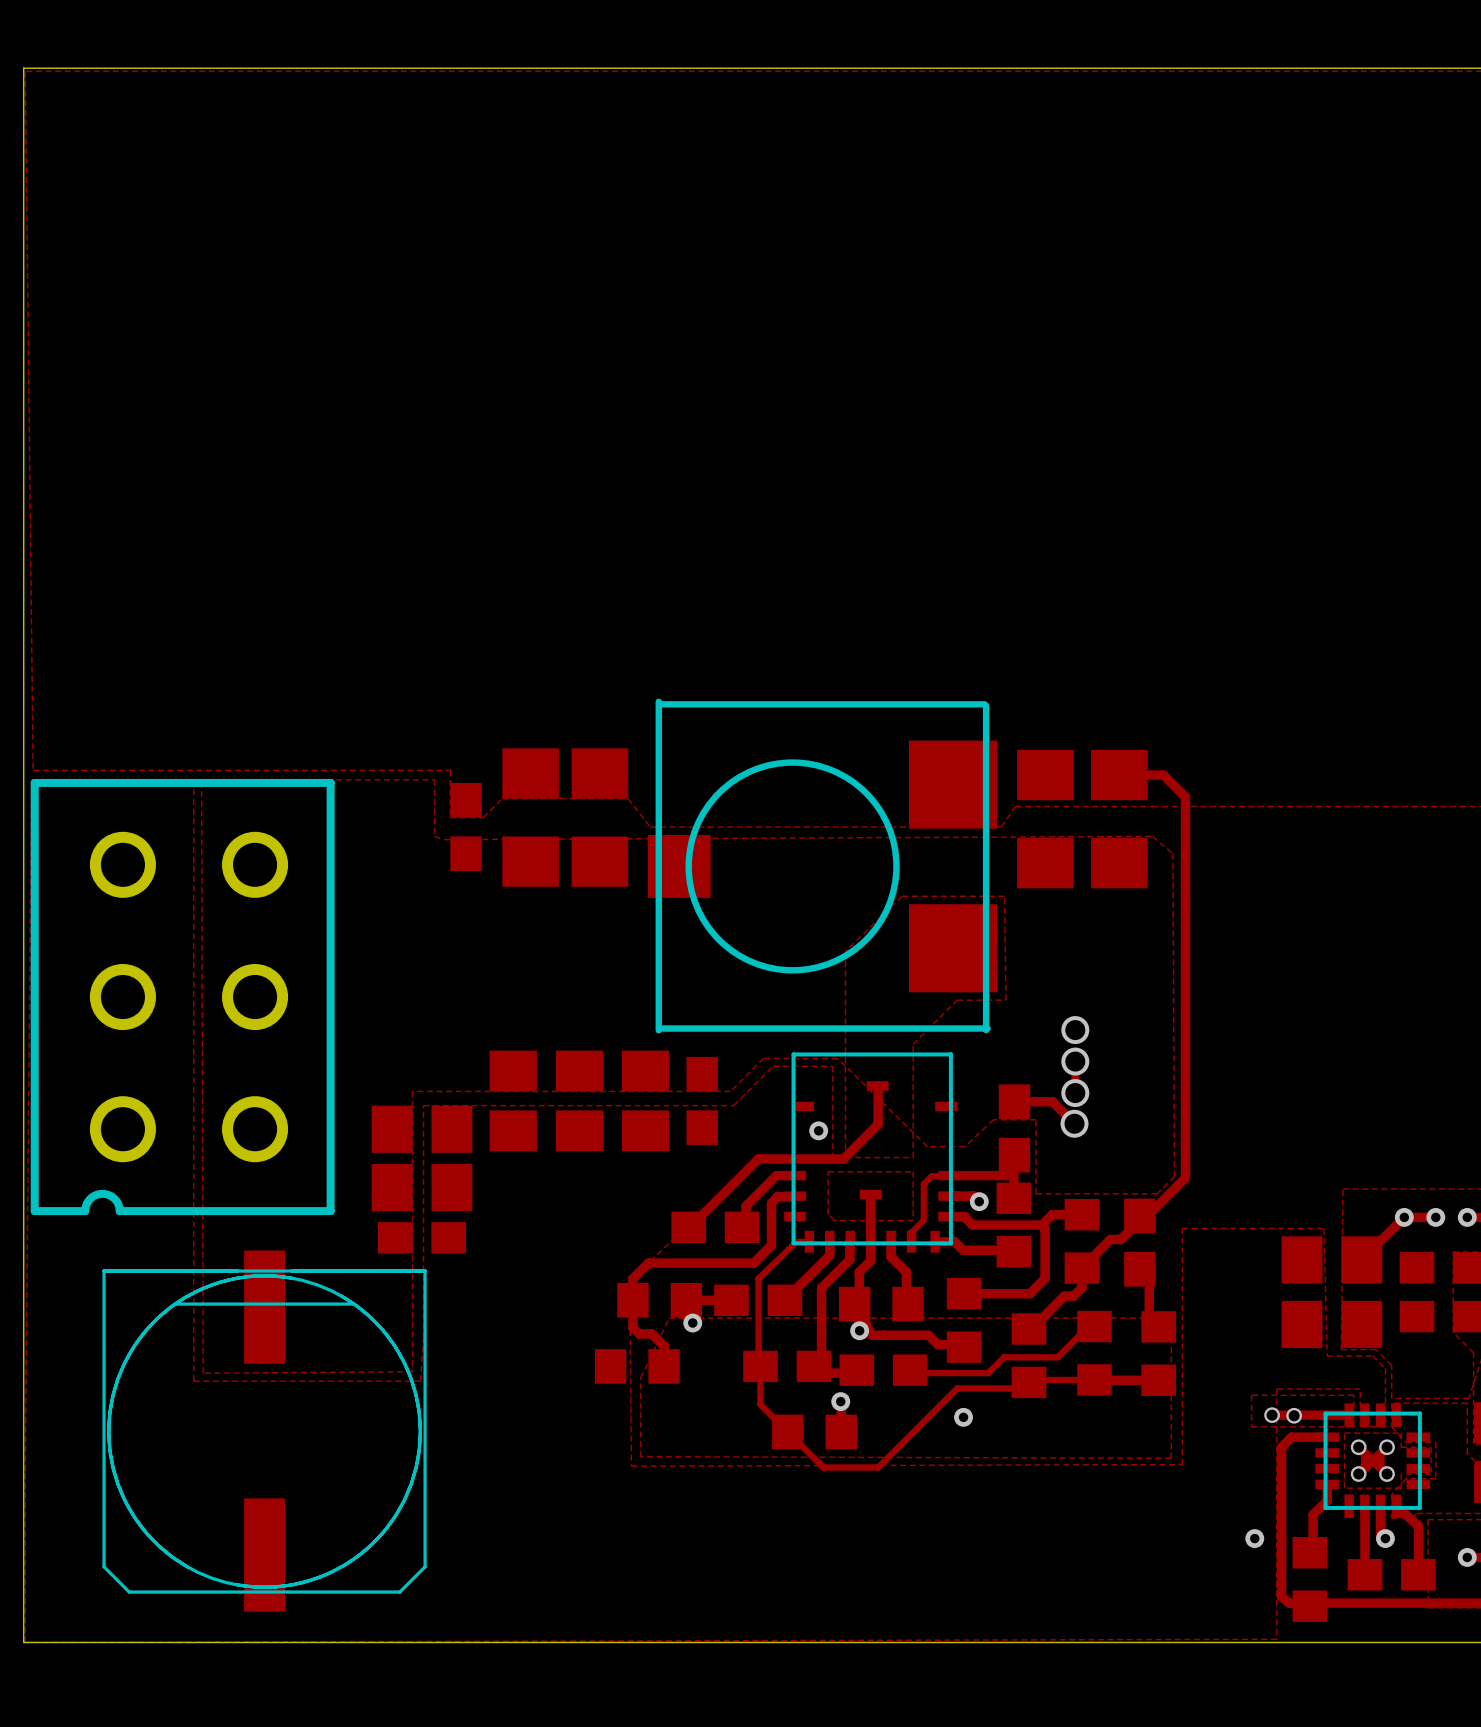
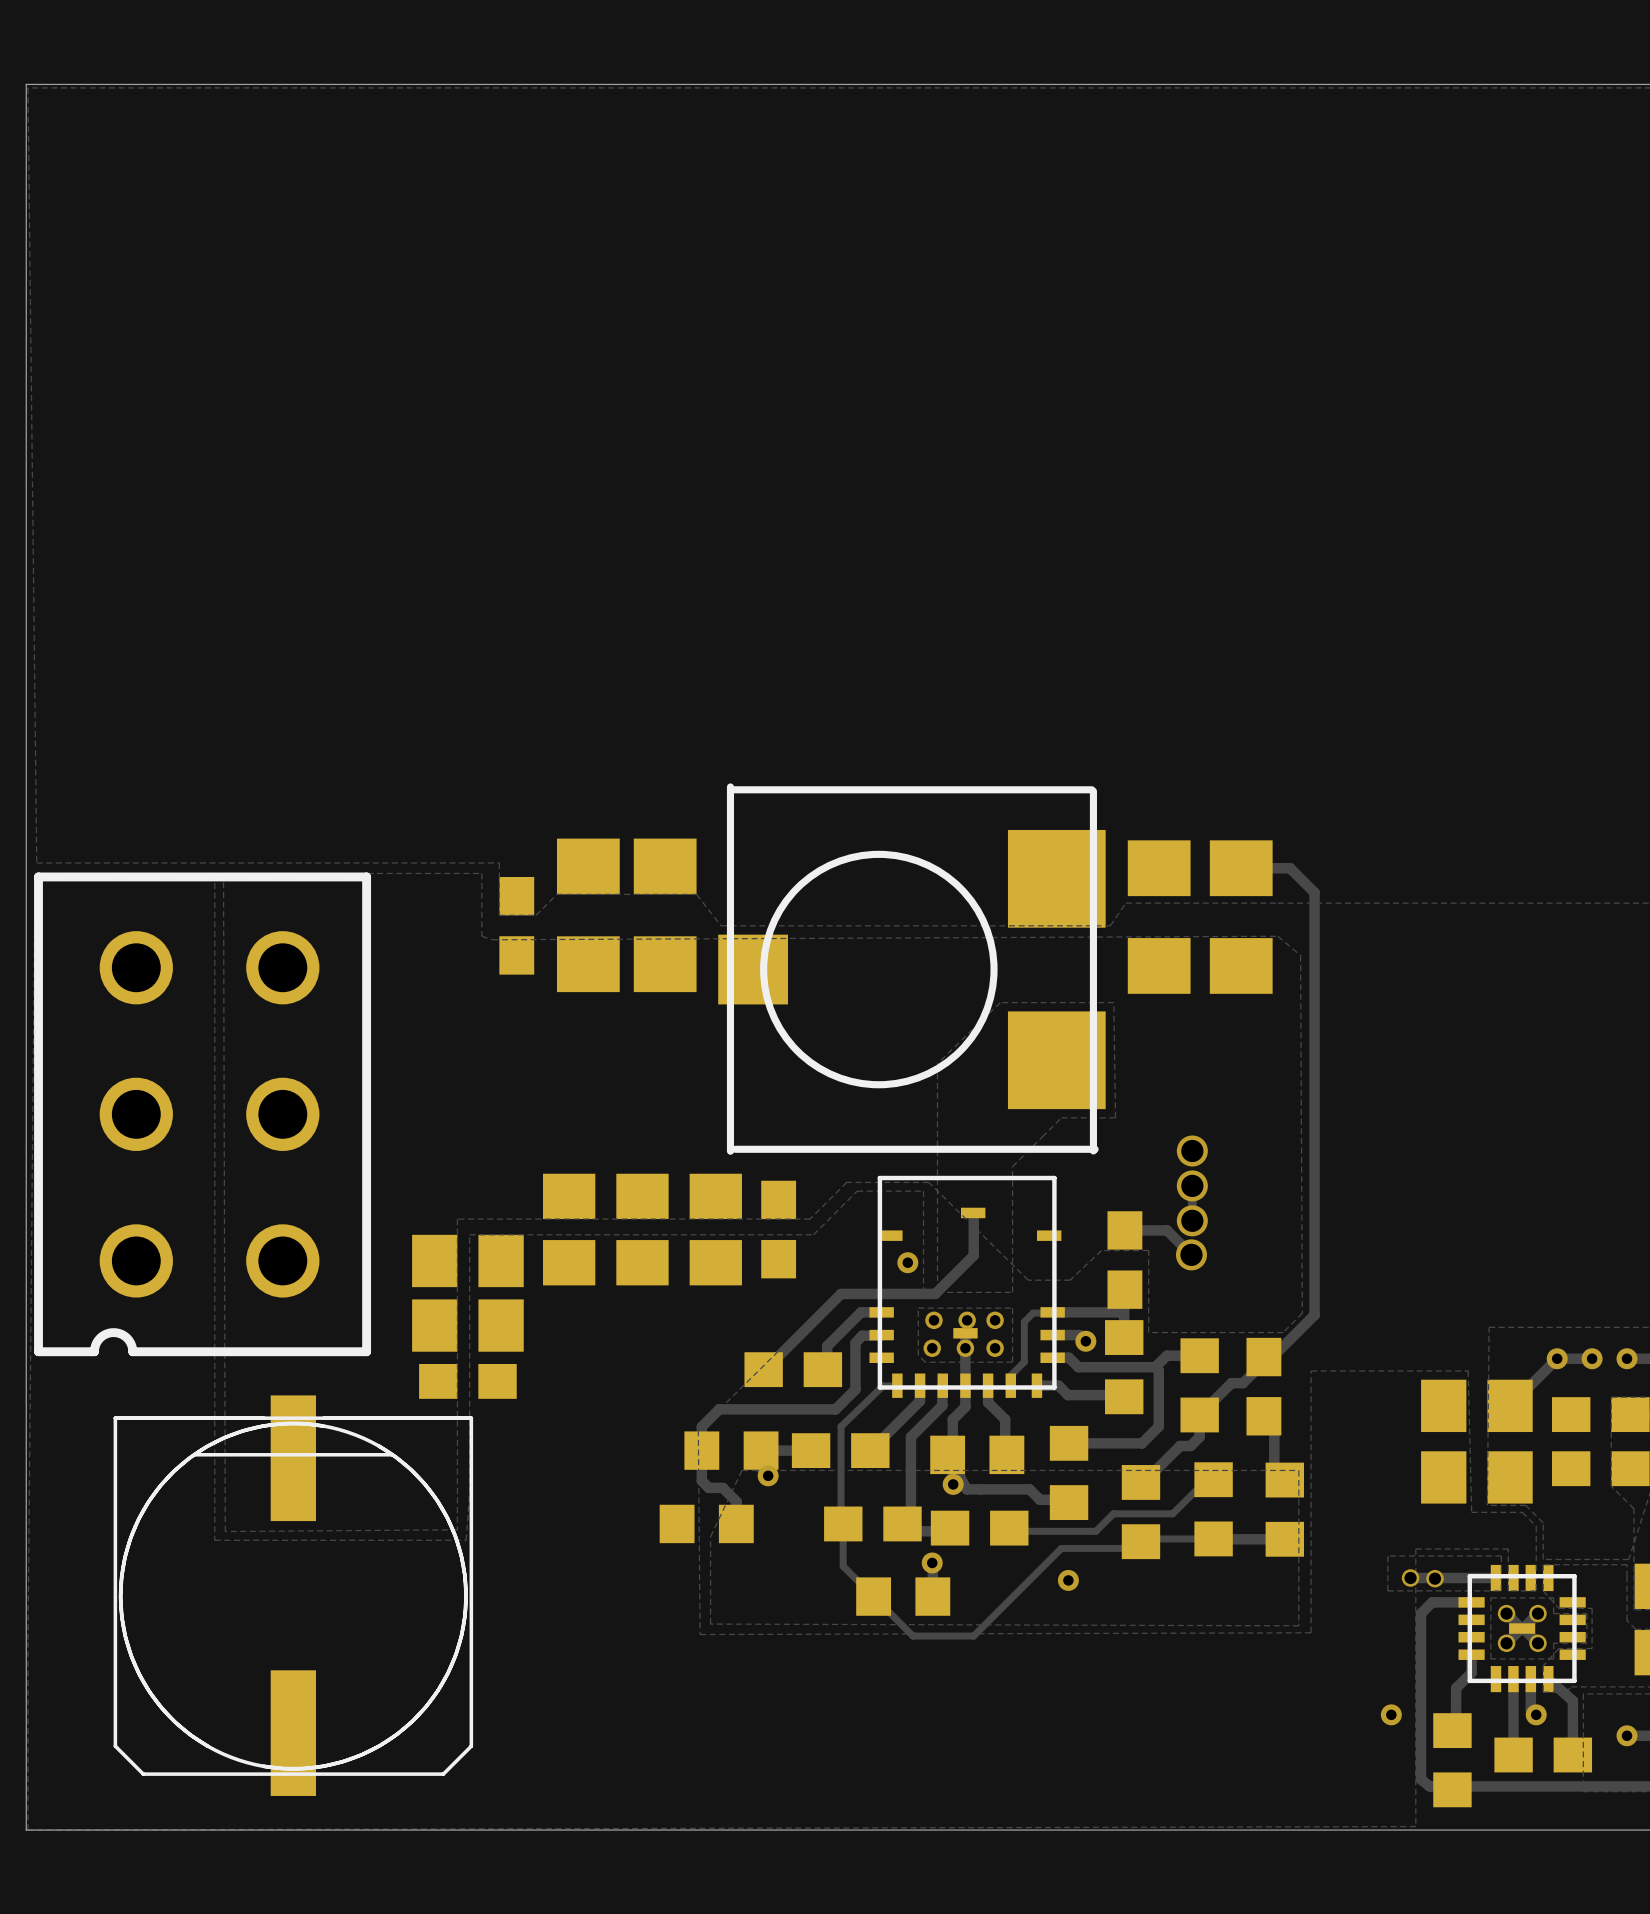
via: none -> (934, 1320)
via: none -> (967, 1320)
via: none -> (995, 1320)
via: none -> (932, 1348)
via: none -> (965, 1348)
via: none -> (995, 1348)

